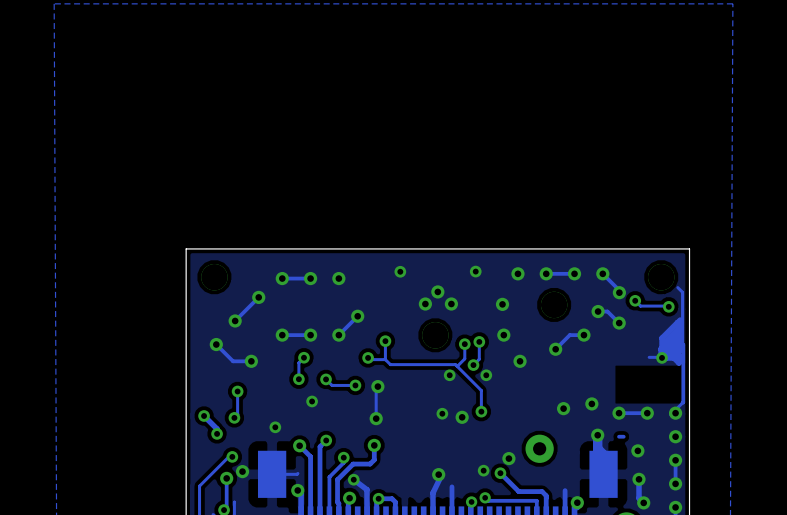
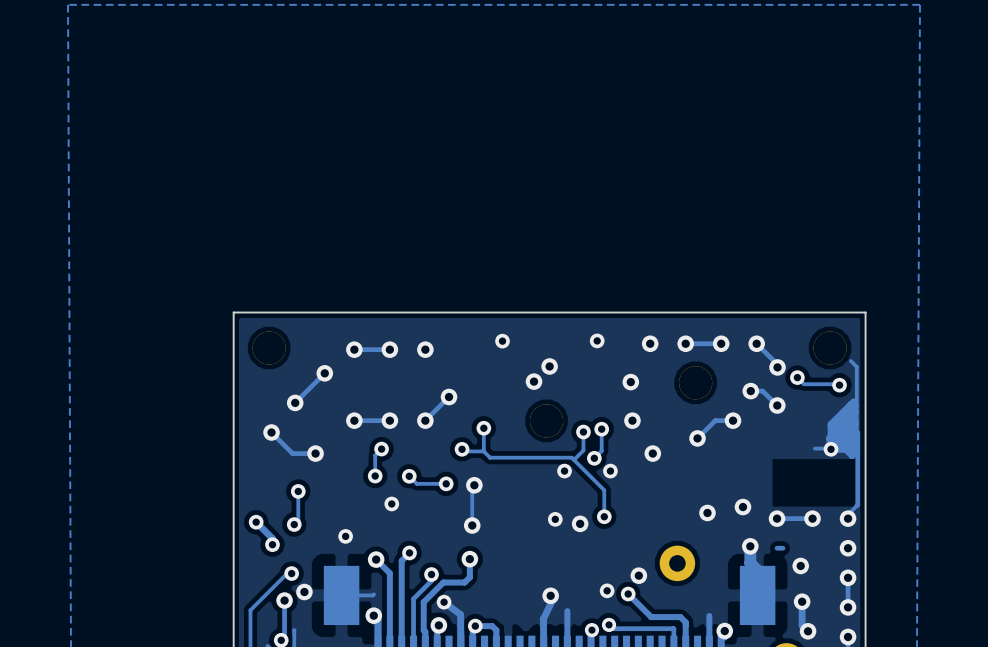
via: (451, 304) -> none

